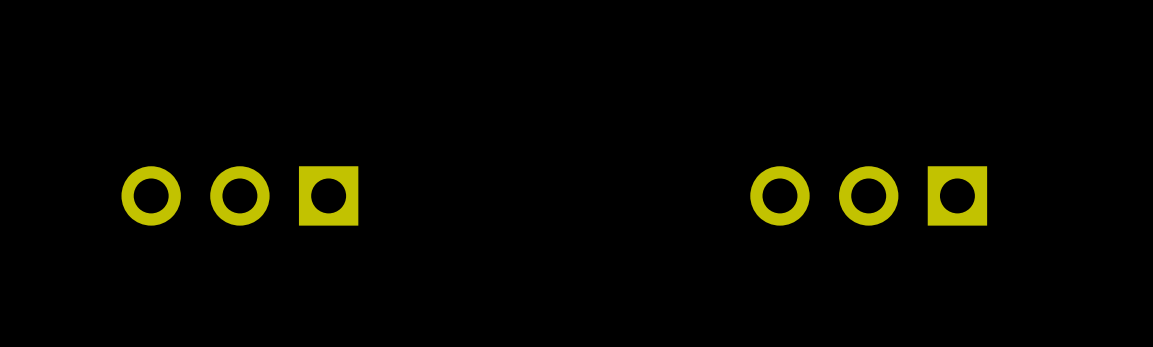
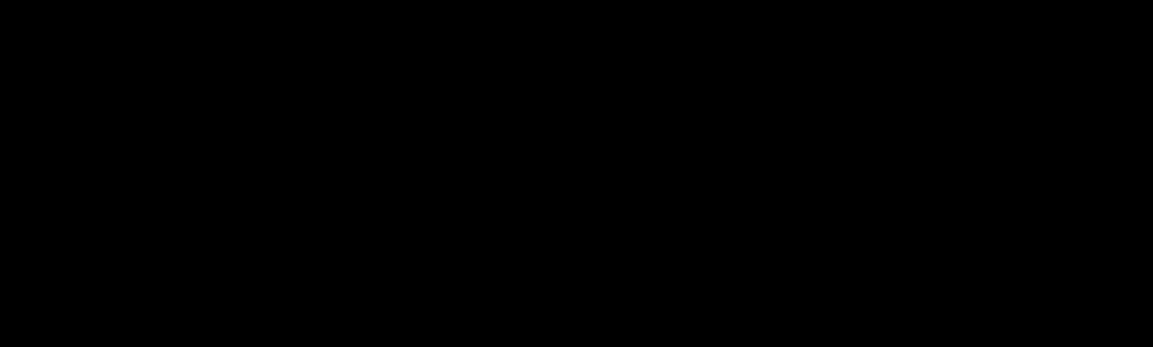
part: (239, 195) -> none
part: (868, 195) -> none

